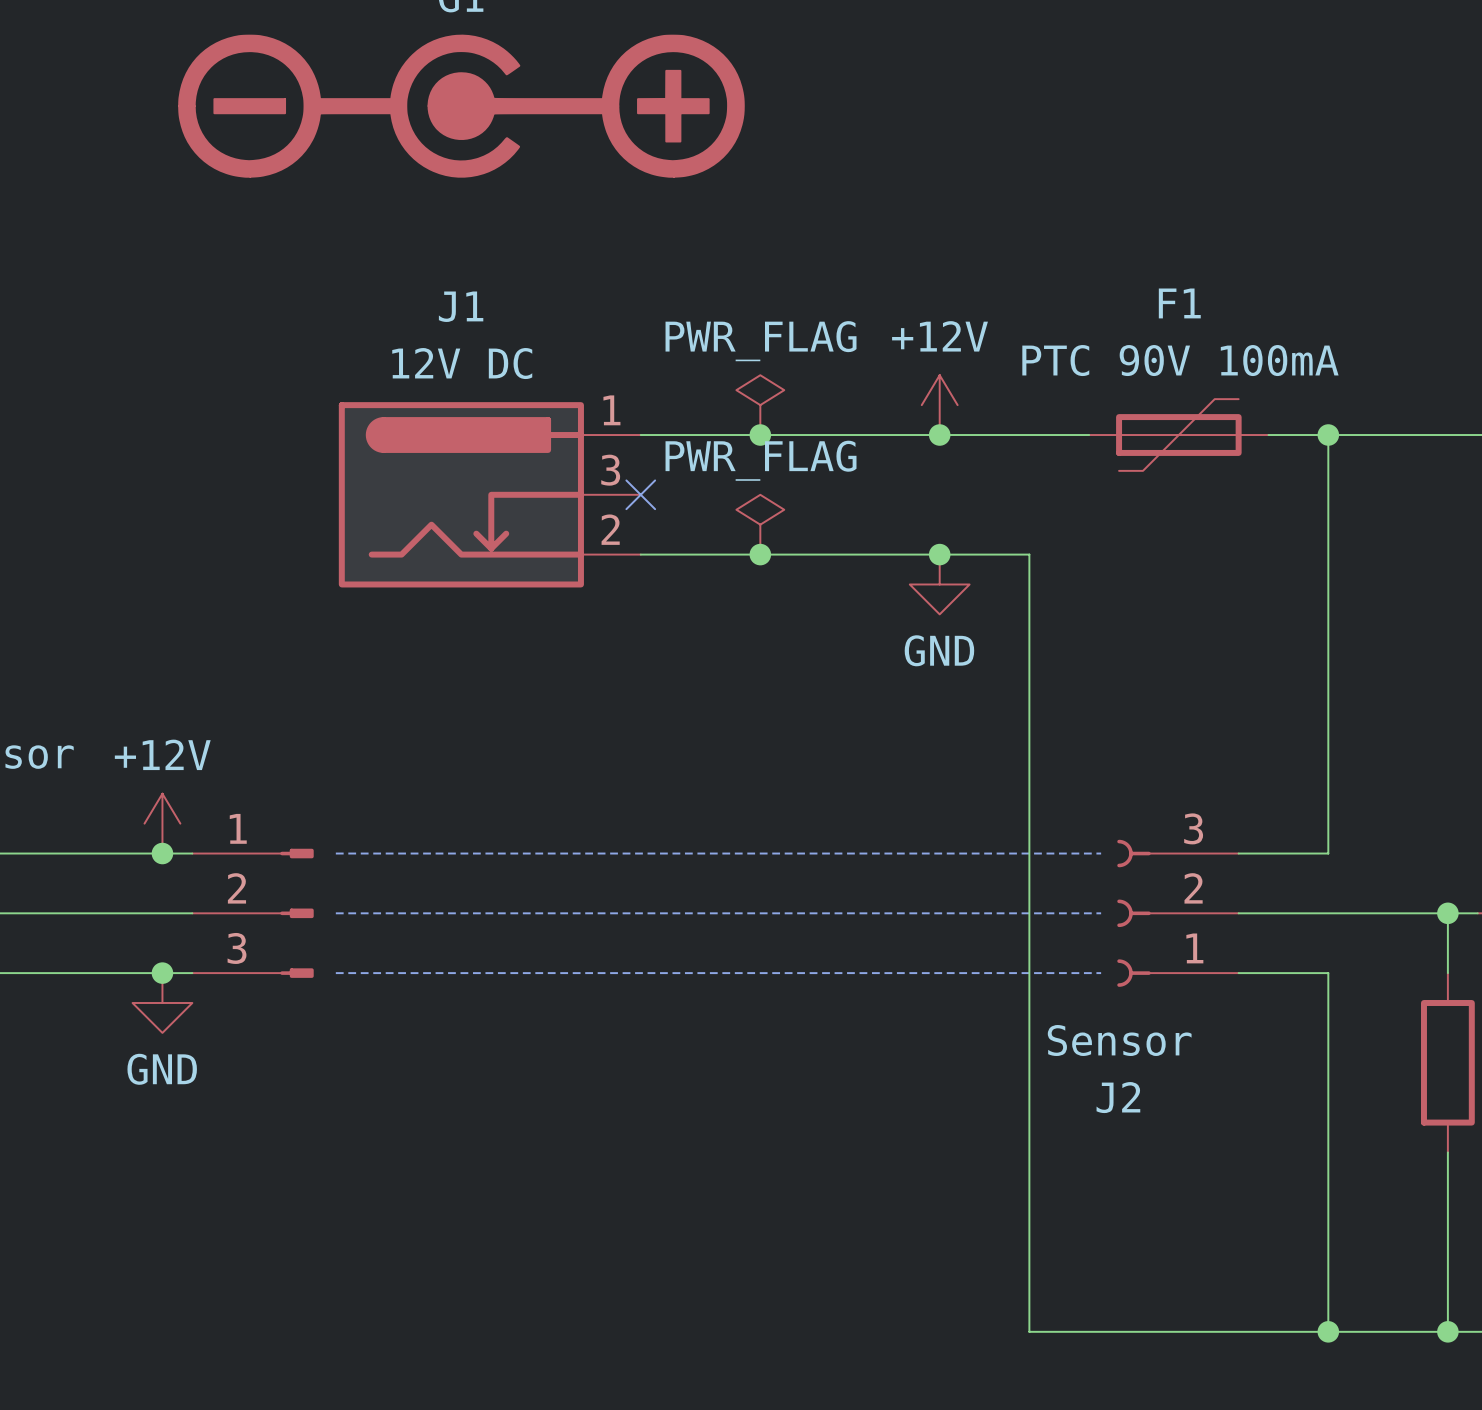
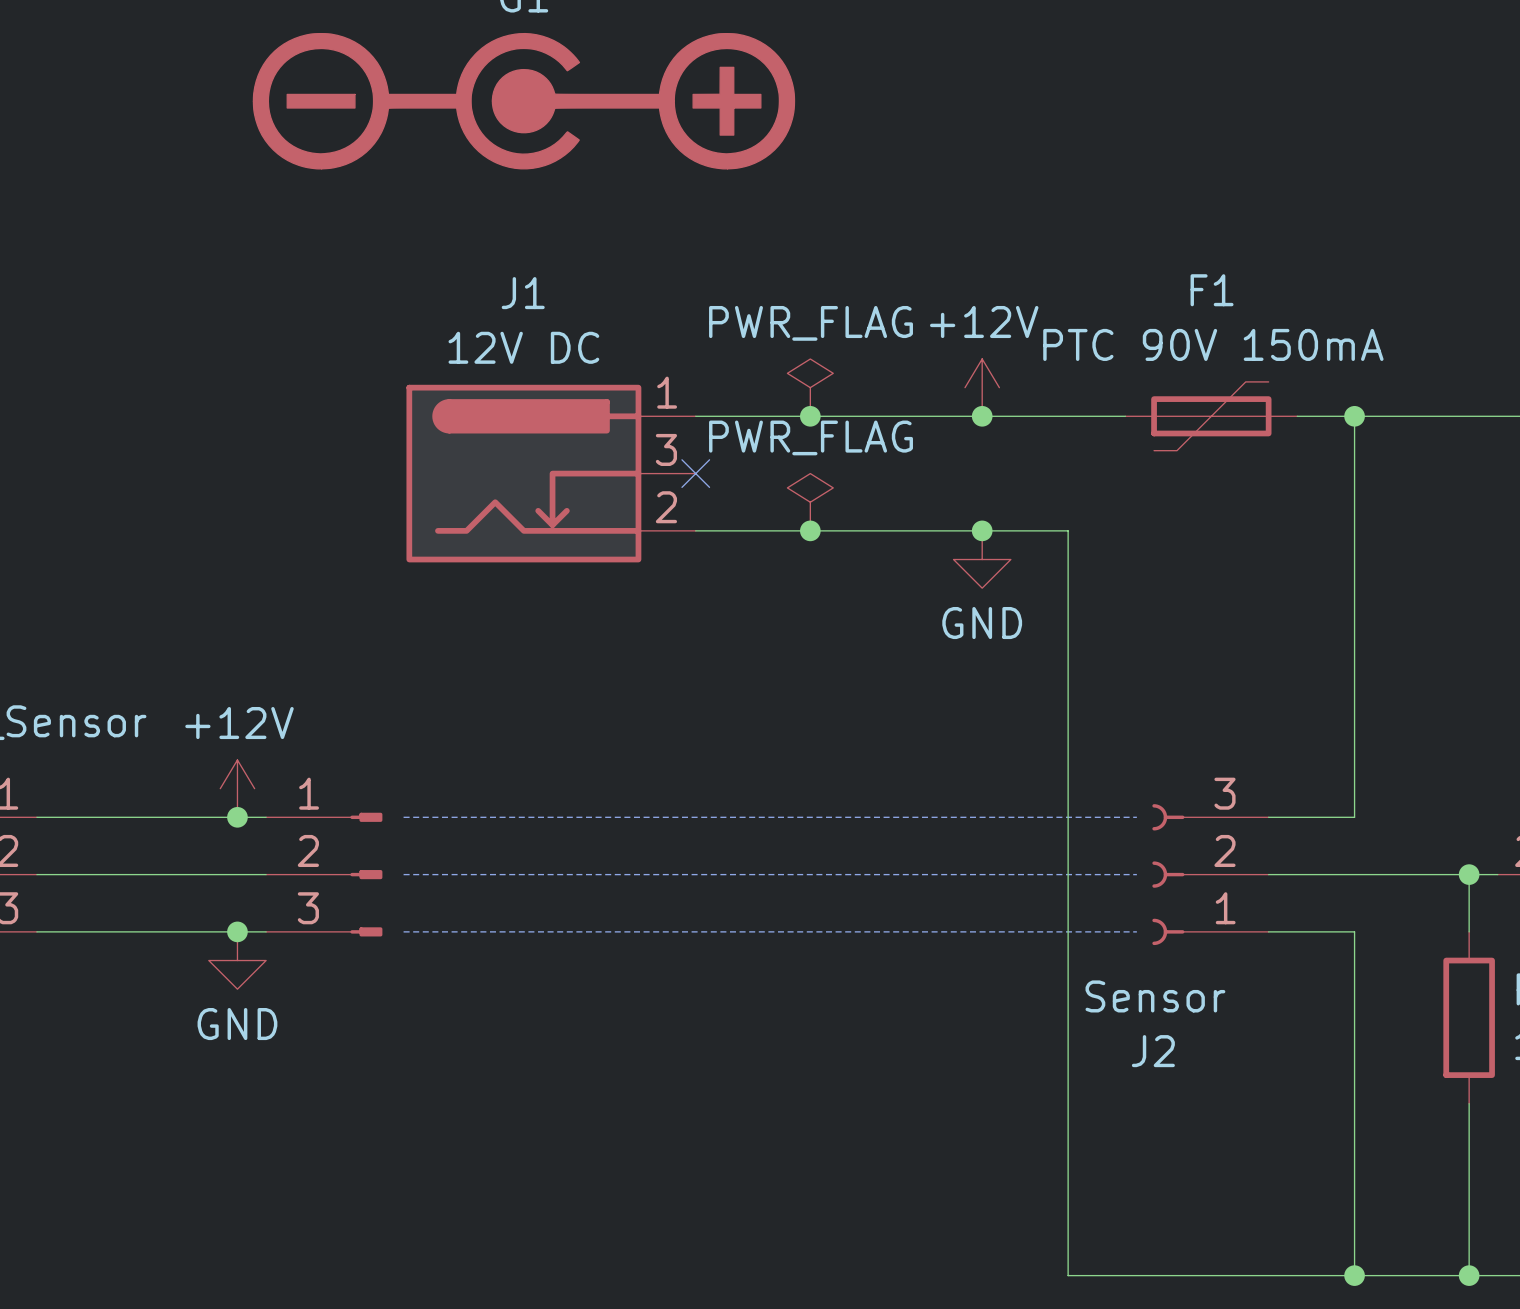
F1 value: PTC 90V 100mA (1180, 360) -> PTC 90V 150mA (1213, 344)

